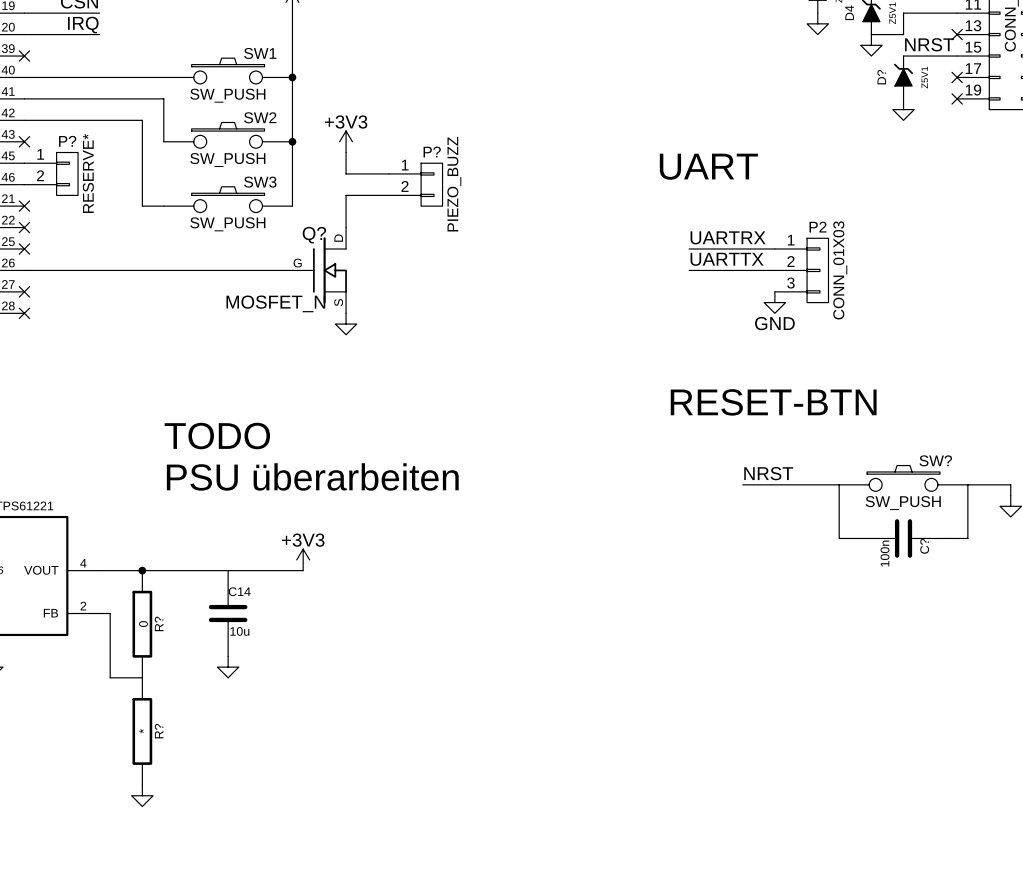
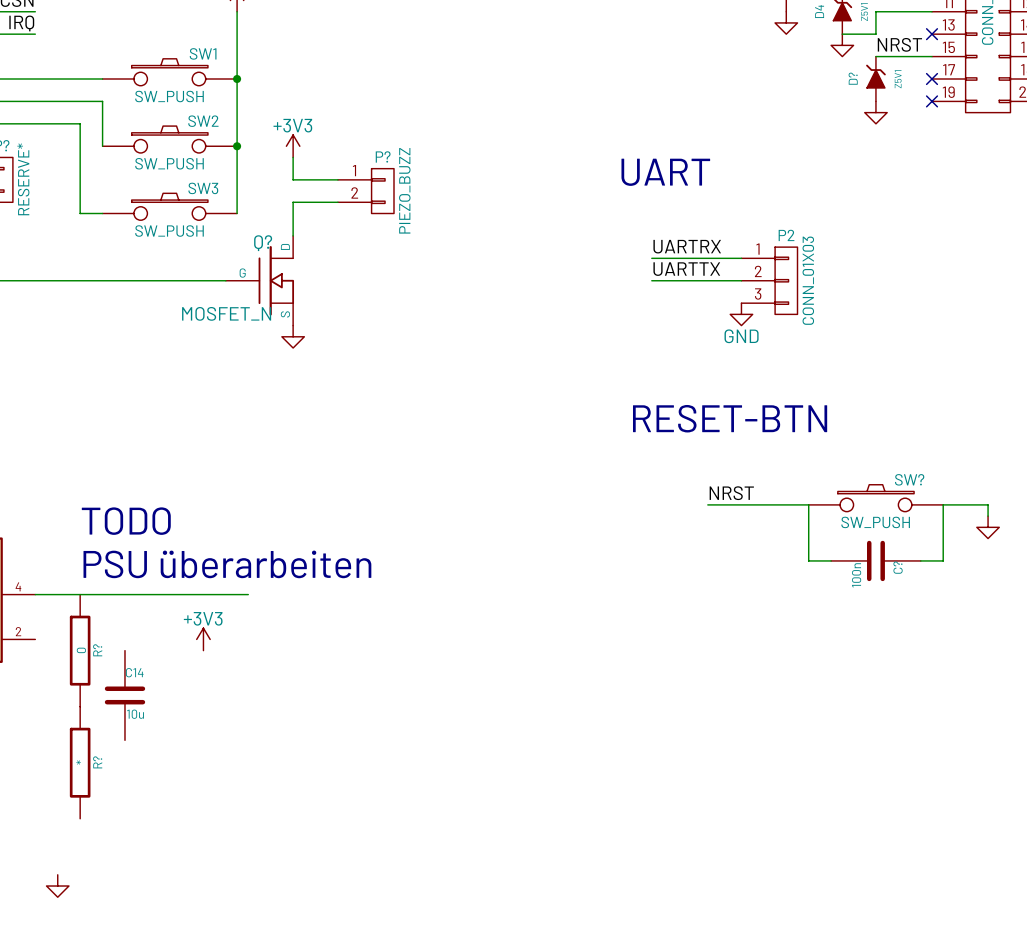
text position: TODO (217, 436) -> TODO (126, 521)
text position: PSU überarbeiten (312, 476) -> PSU überarbeiten (227, 564)
power symbol position: +3V3 (303, 559) -> +3V3 (203, 639)
junction: (142, 570) -> none
wire: (99, 613) (110, 613) (110, 677) (142, 677) -> none
C14 position: (228, 613) -> (124, 695)
power symbol: (228, 667) -> none
power symbol position: (142, 795) -> (57, 886)

